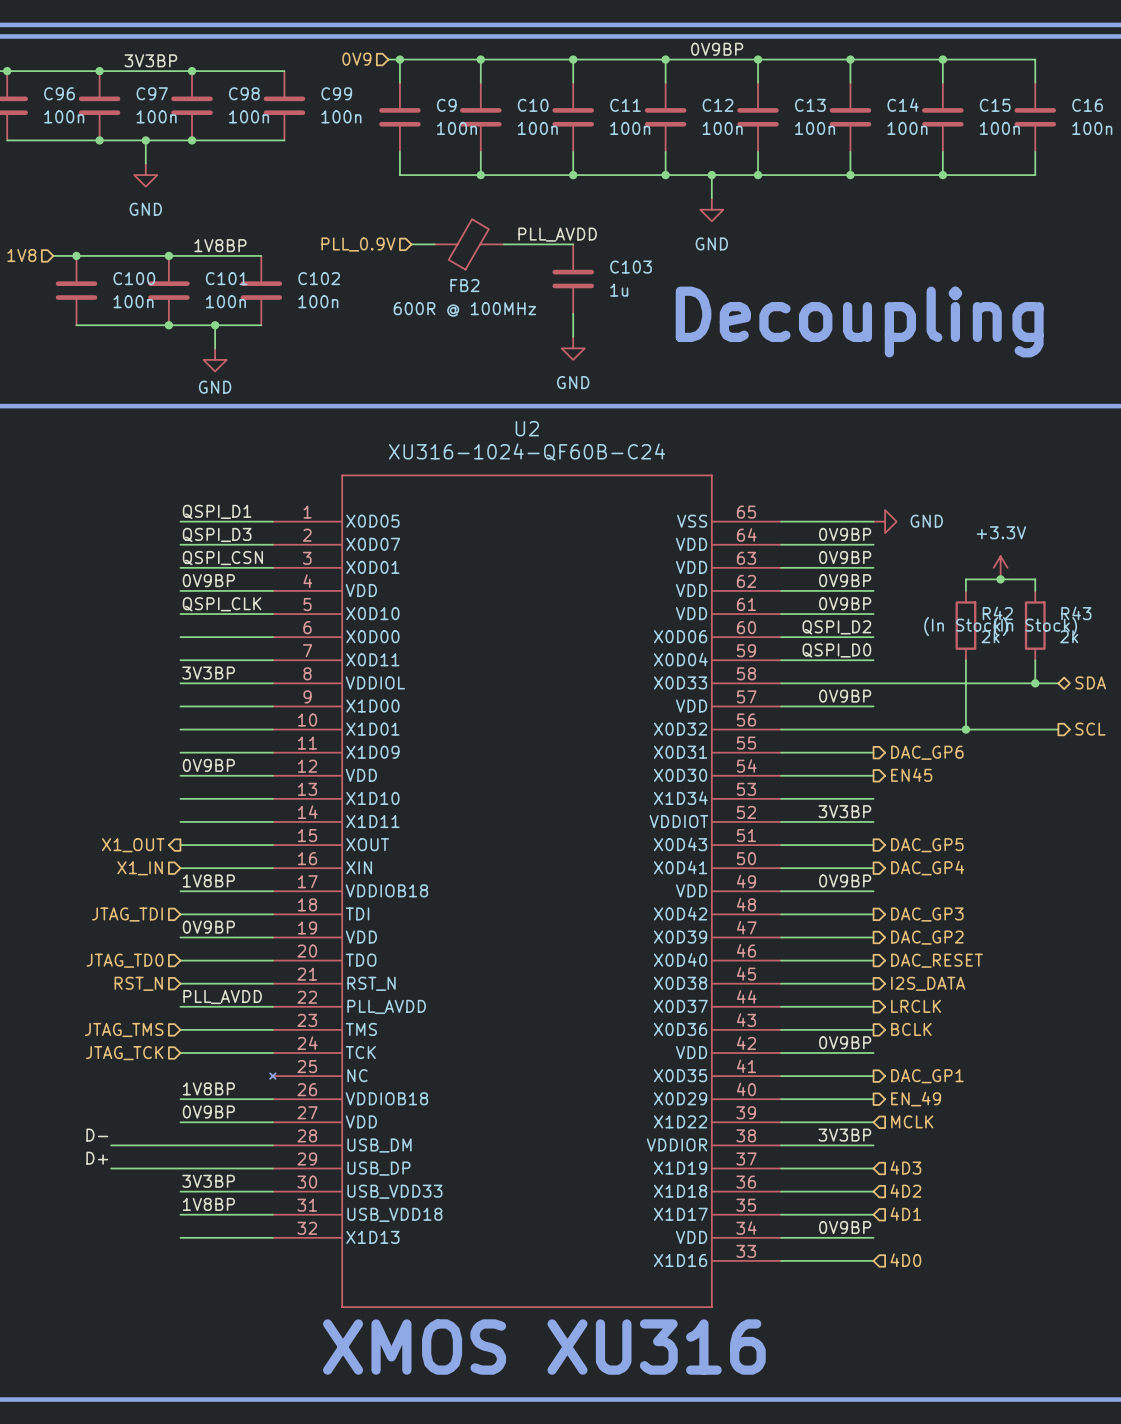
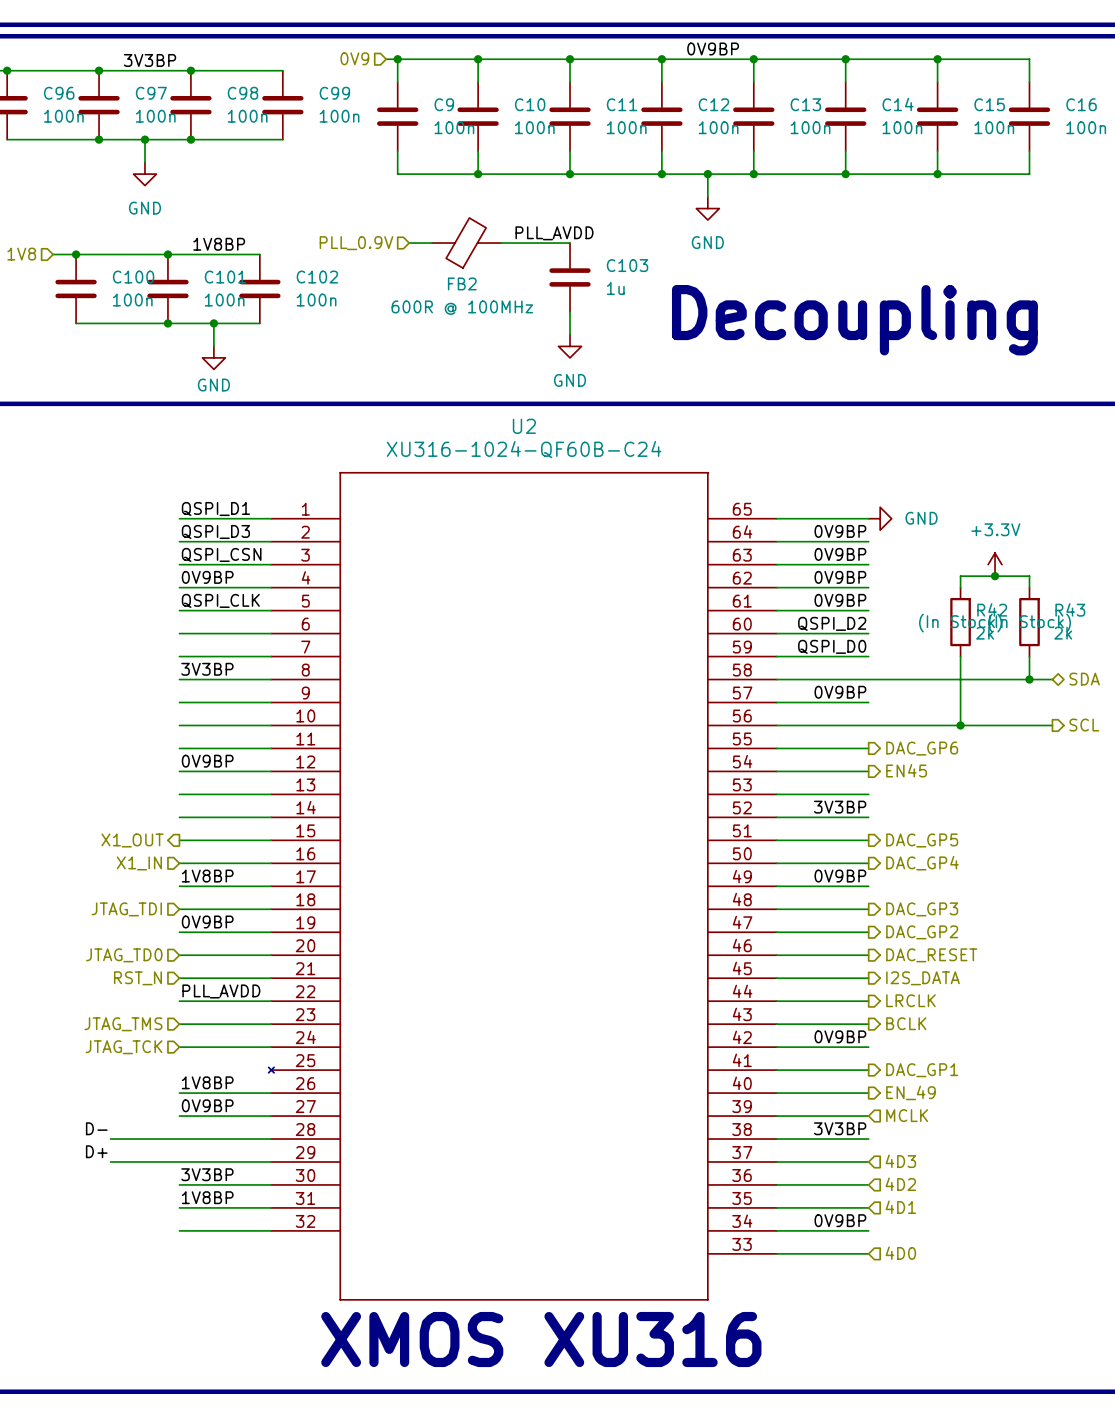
U2 symbol: [270, 474, 782, 1308] -> [268, 472, 777, 1301]

